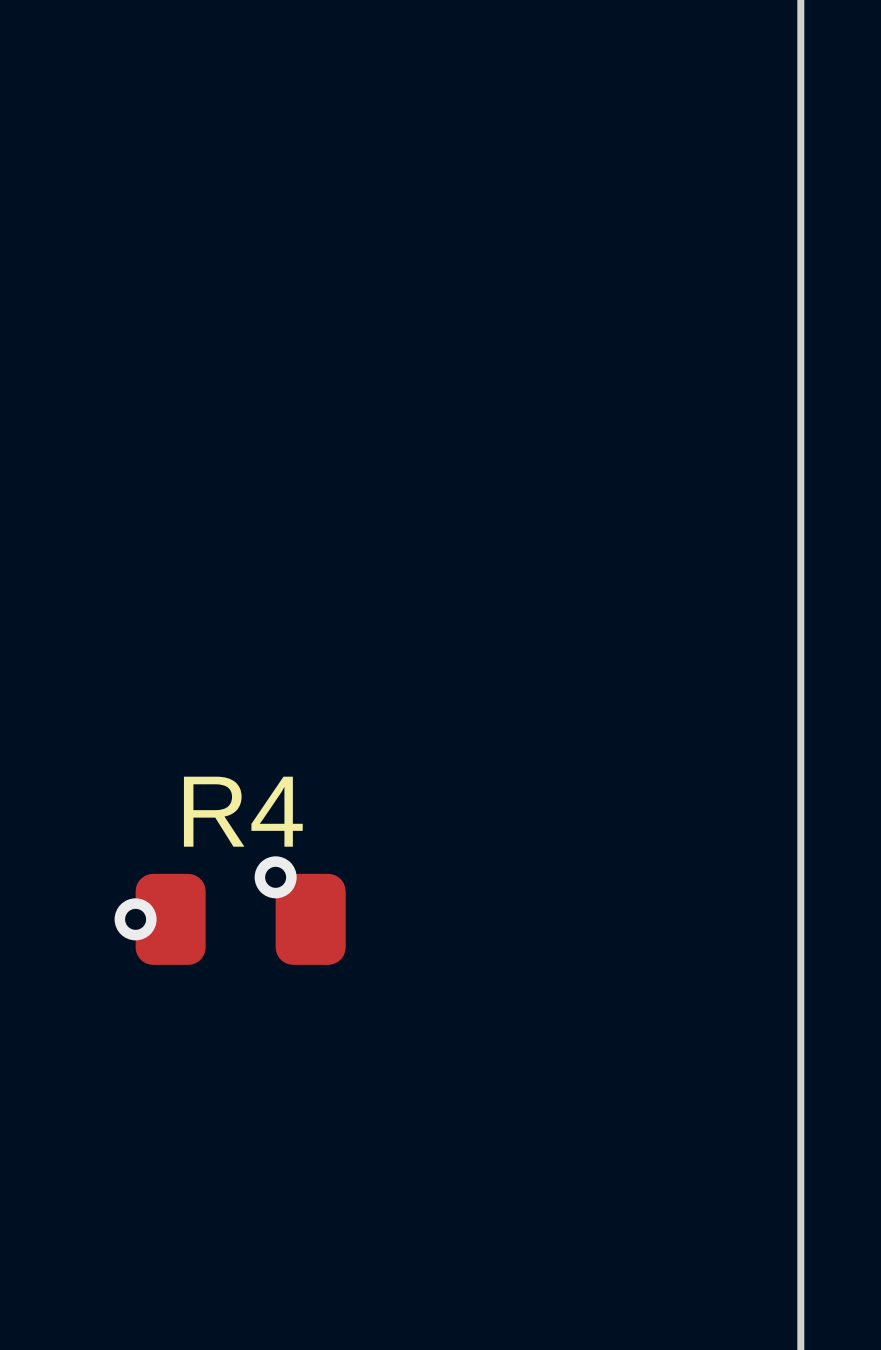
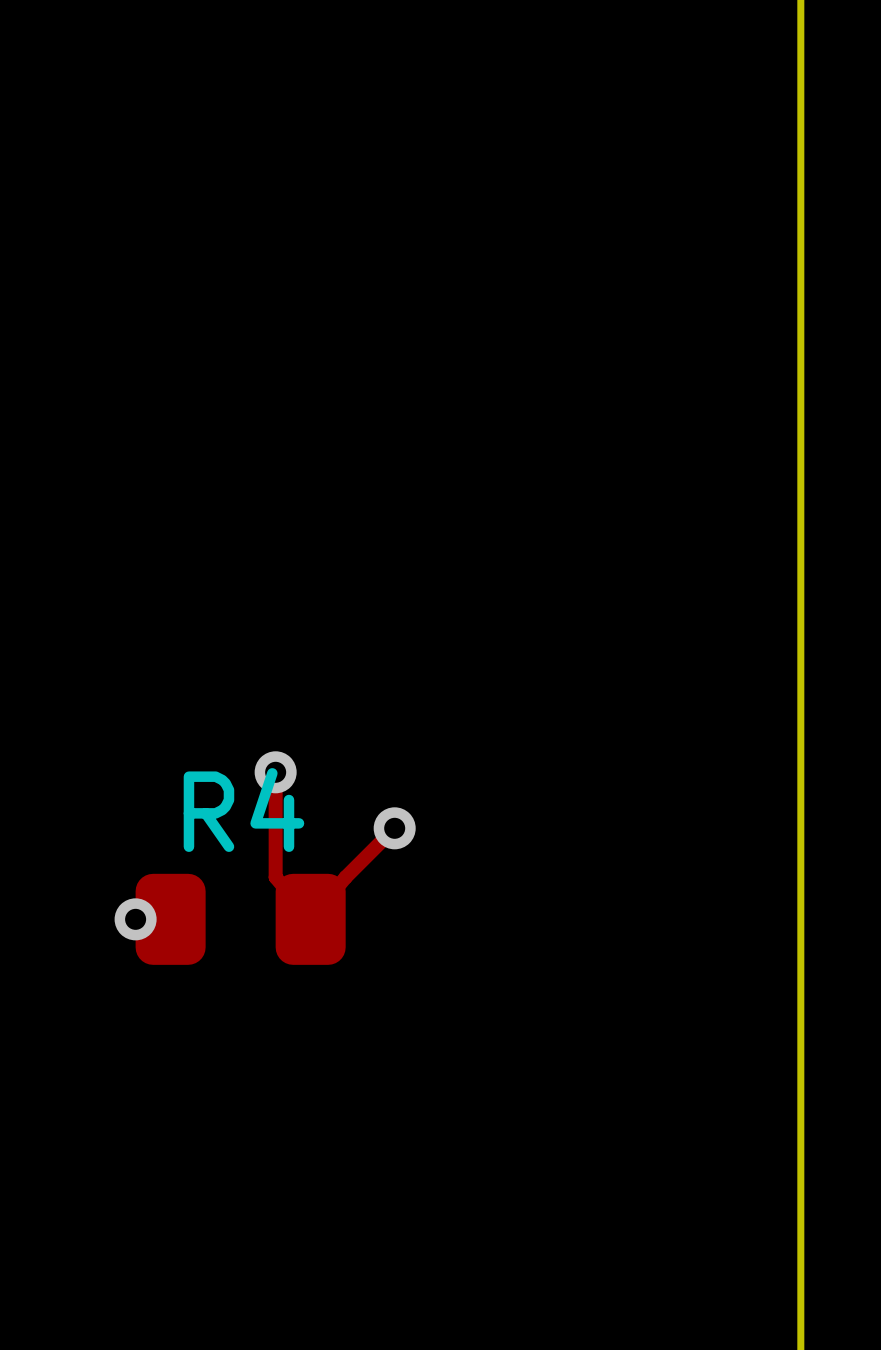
track: none -> (275, 772) (275, 877)
via: none -> (275, 772)
track: none -> (394, 828) (345, 877) (310, 919)
via: none -> (394, 828)
via: (275, 877) -> none

